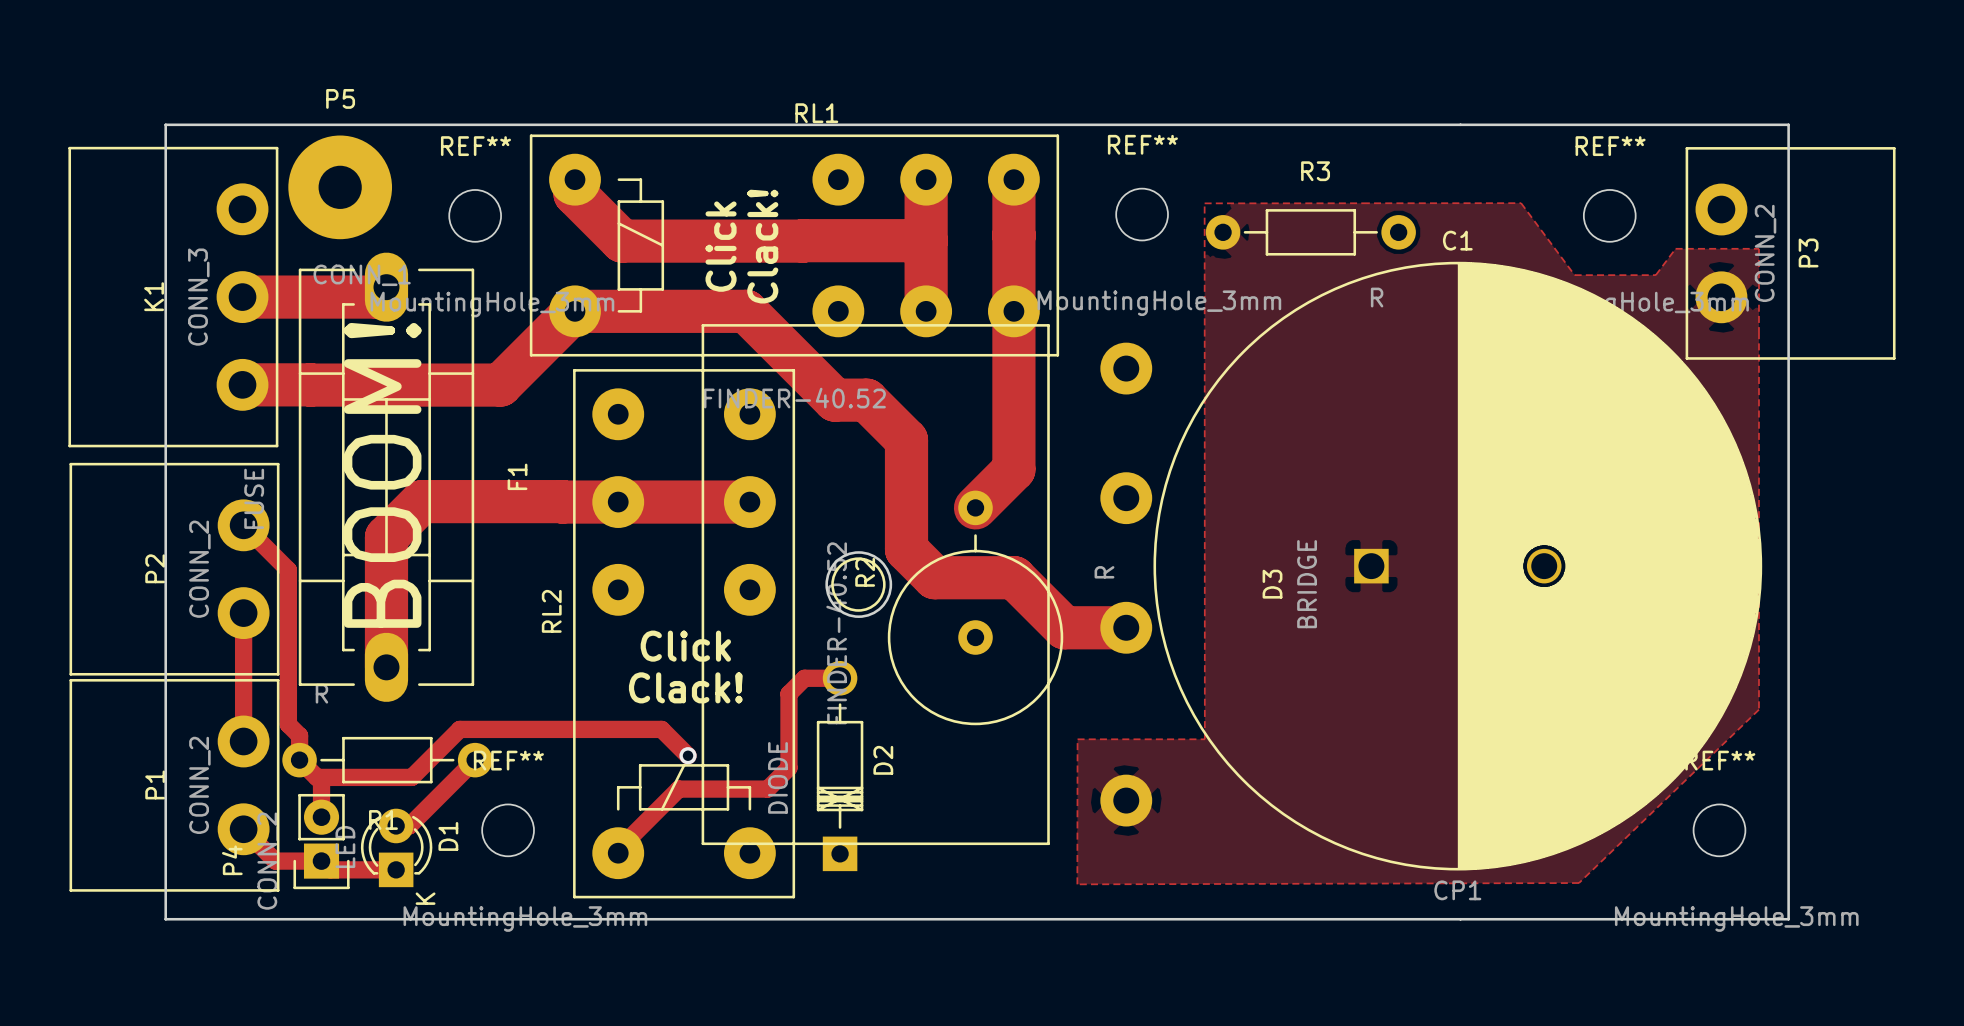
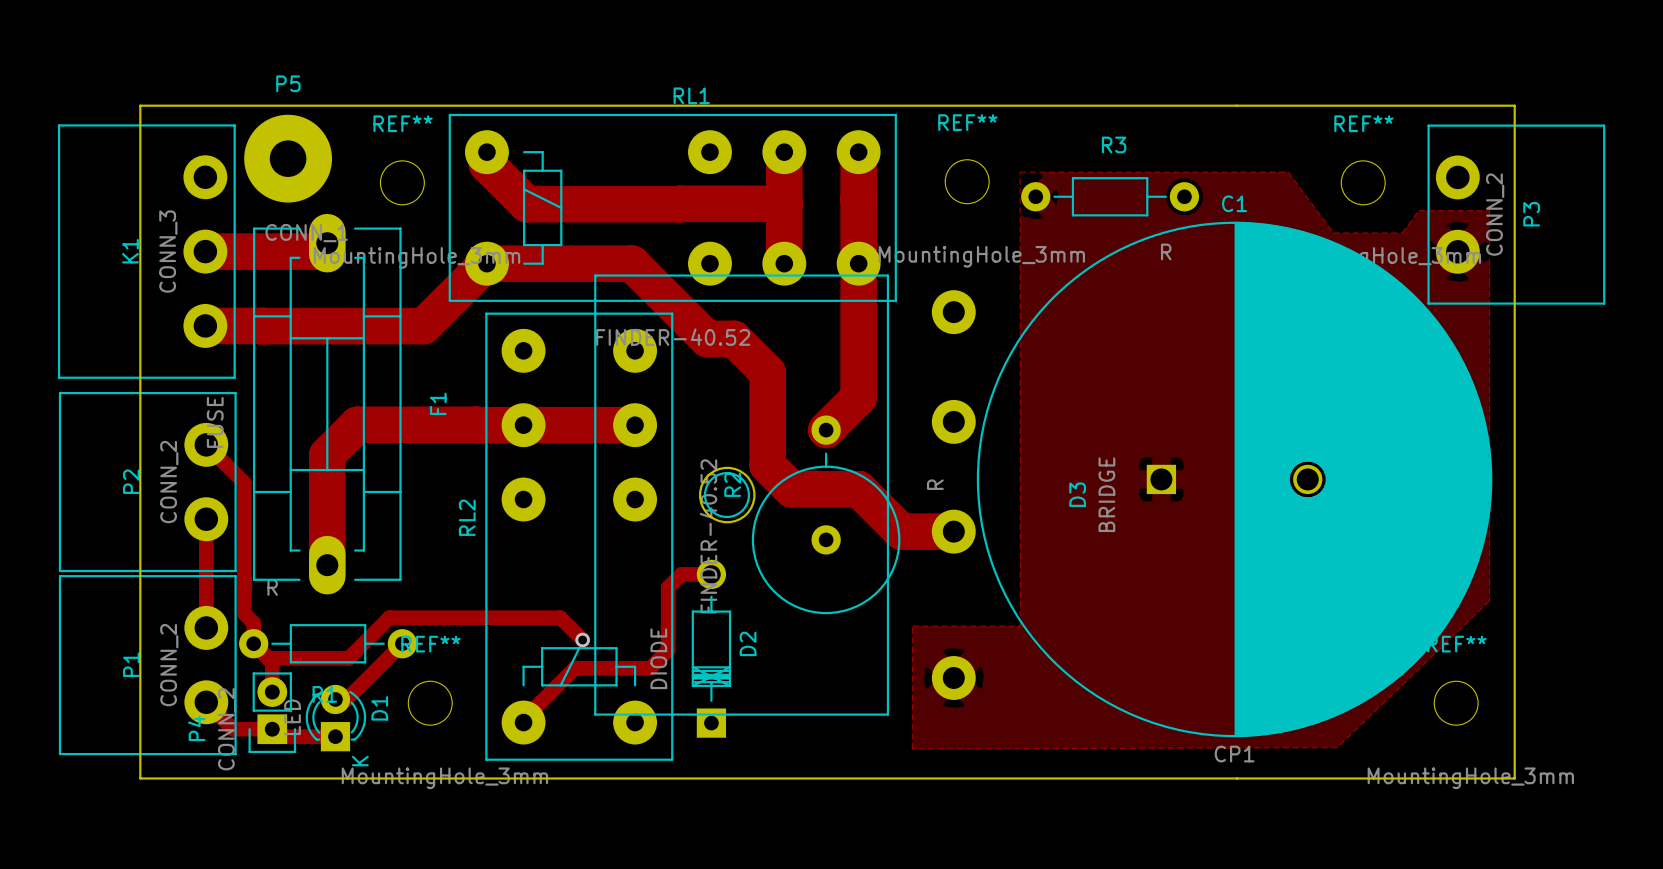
text: Click (721, 246) -> none
text: Clack! (762, 246) -> none
text: BOOM! (382, 475) -> none
text: Click (685, 646) -> none
text: Clack! (685, 687) -> none

